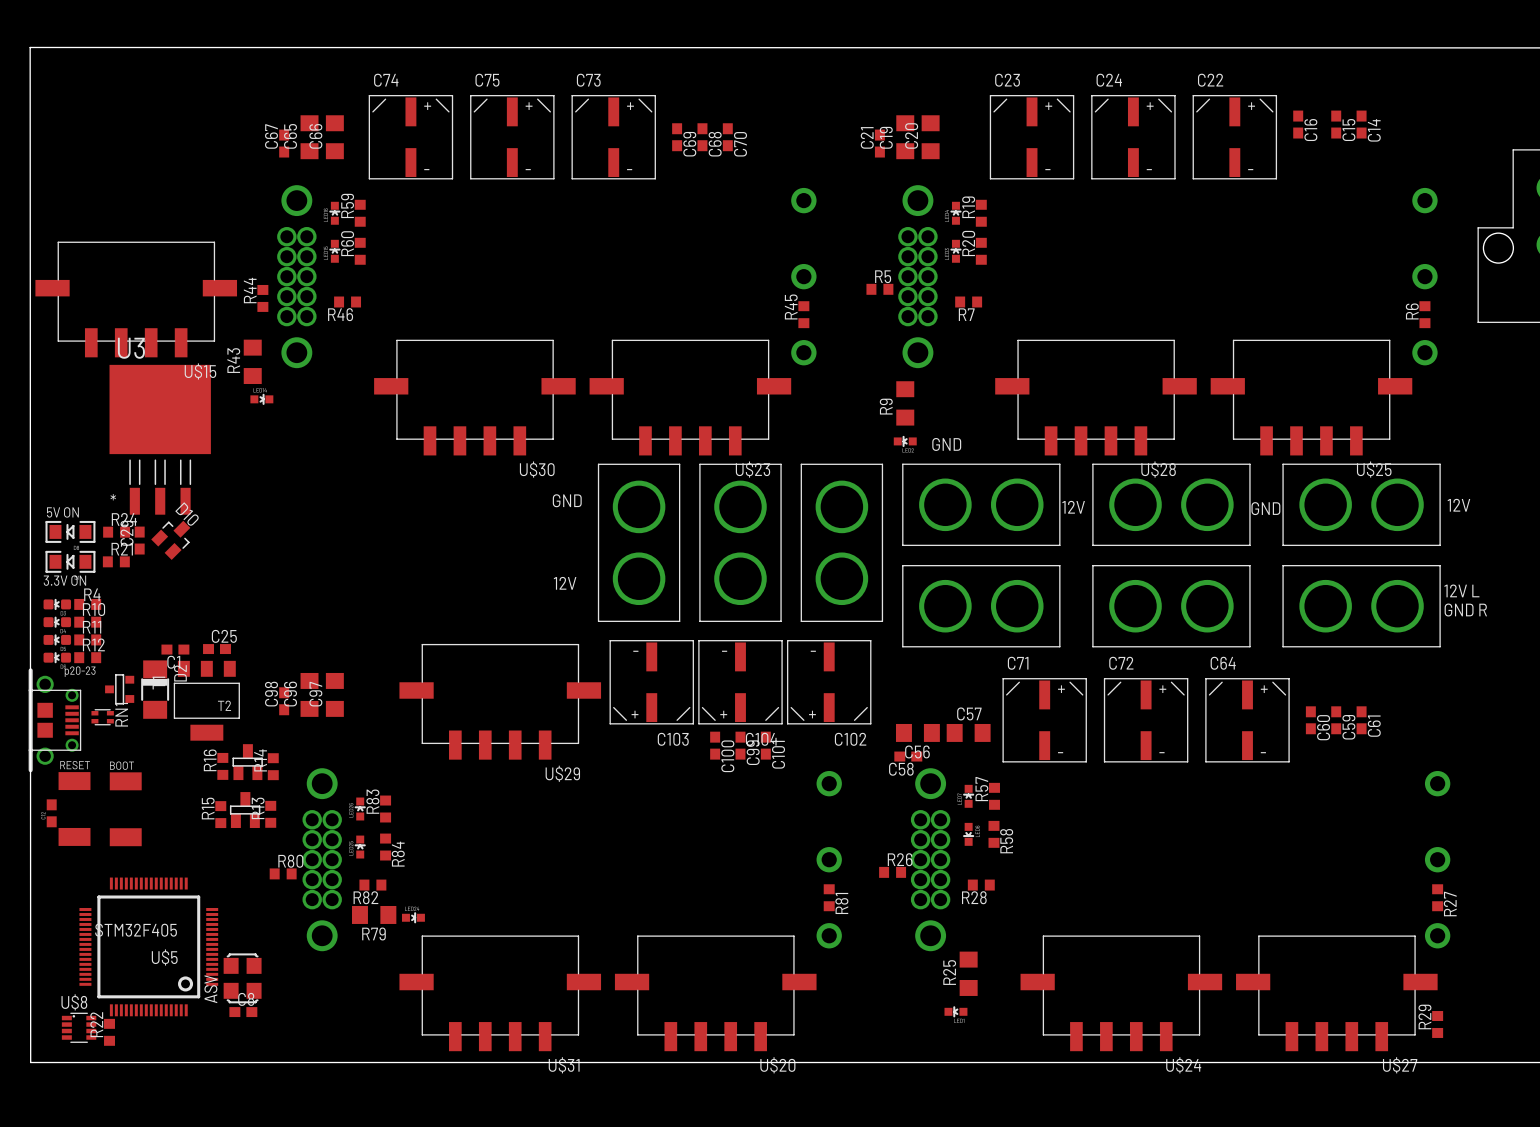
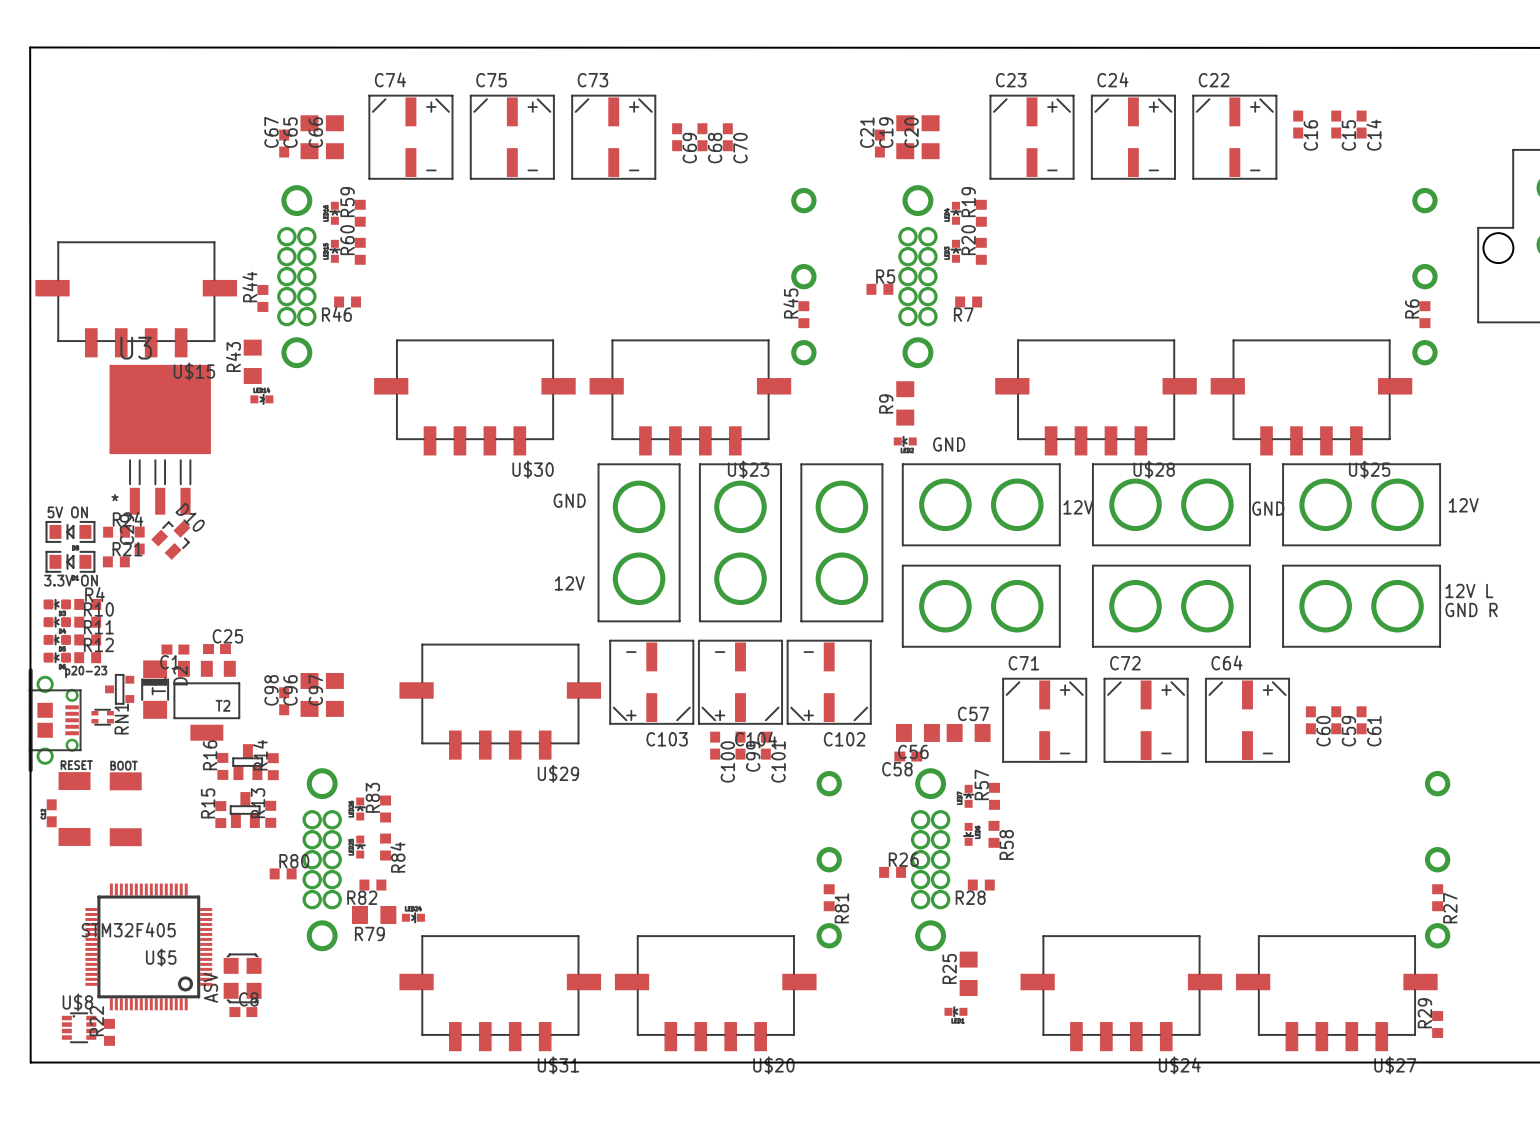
U$5 footprint: [79, 877, 219, 1017] -> [85, 883, 213, 1011]

